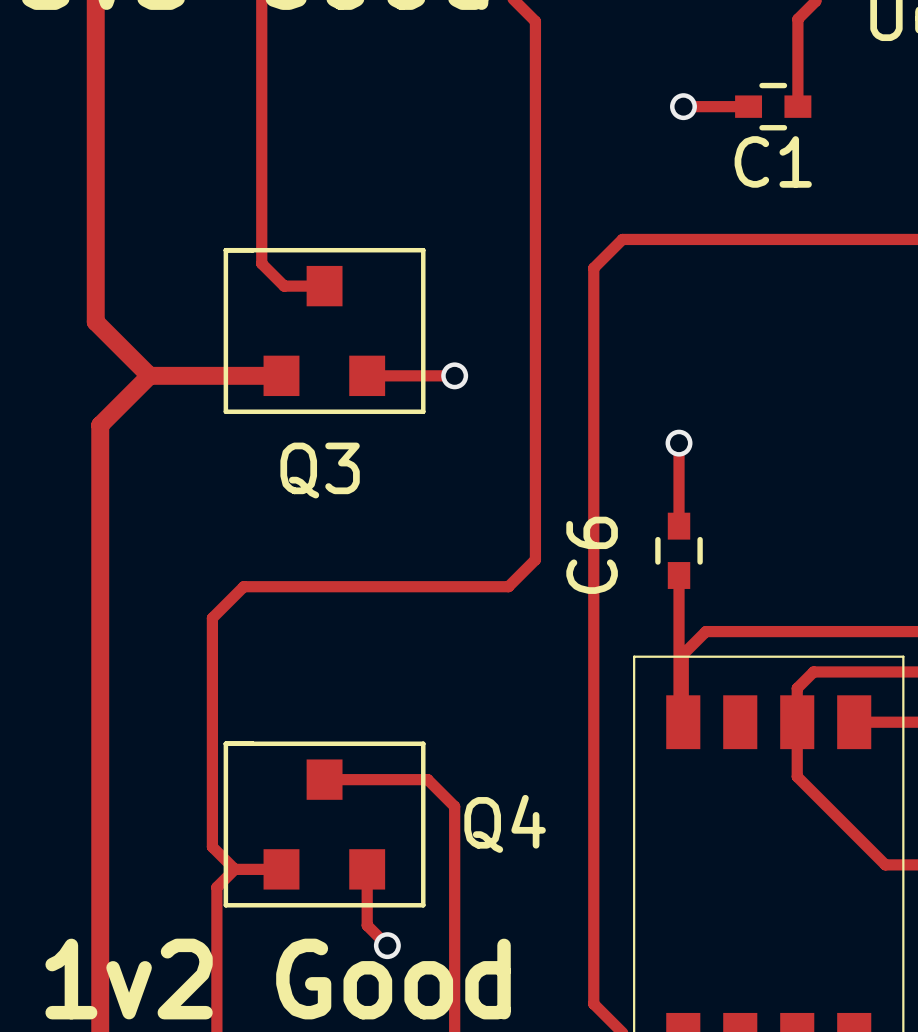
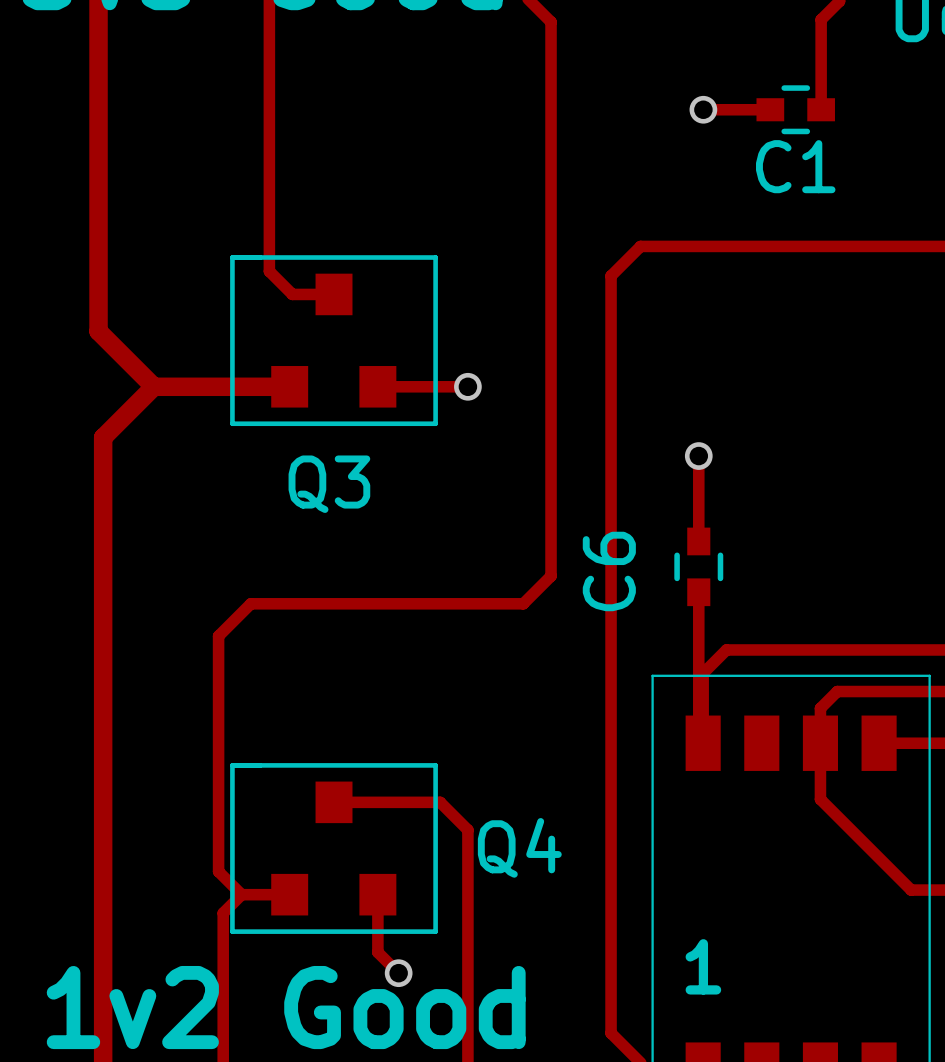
text: none -> 1 (703, 966)

